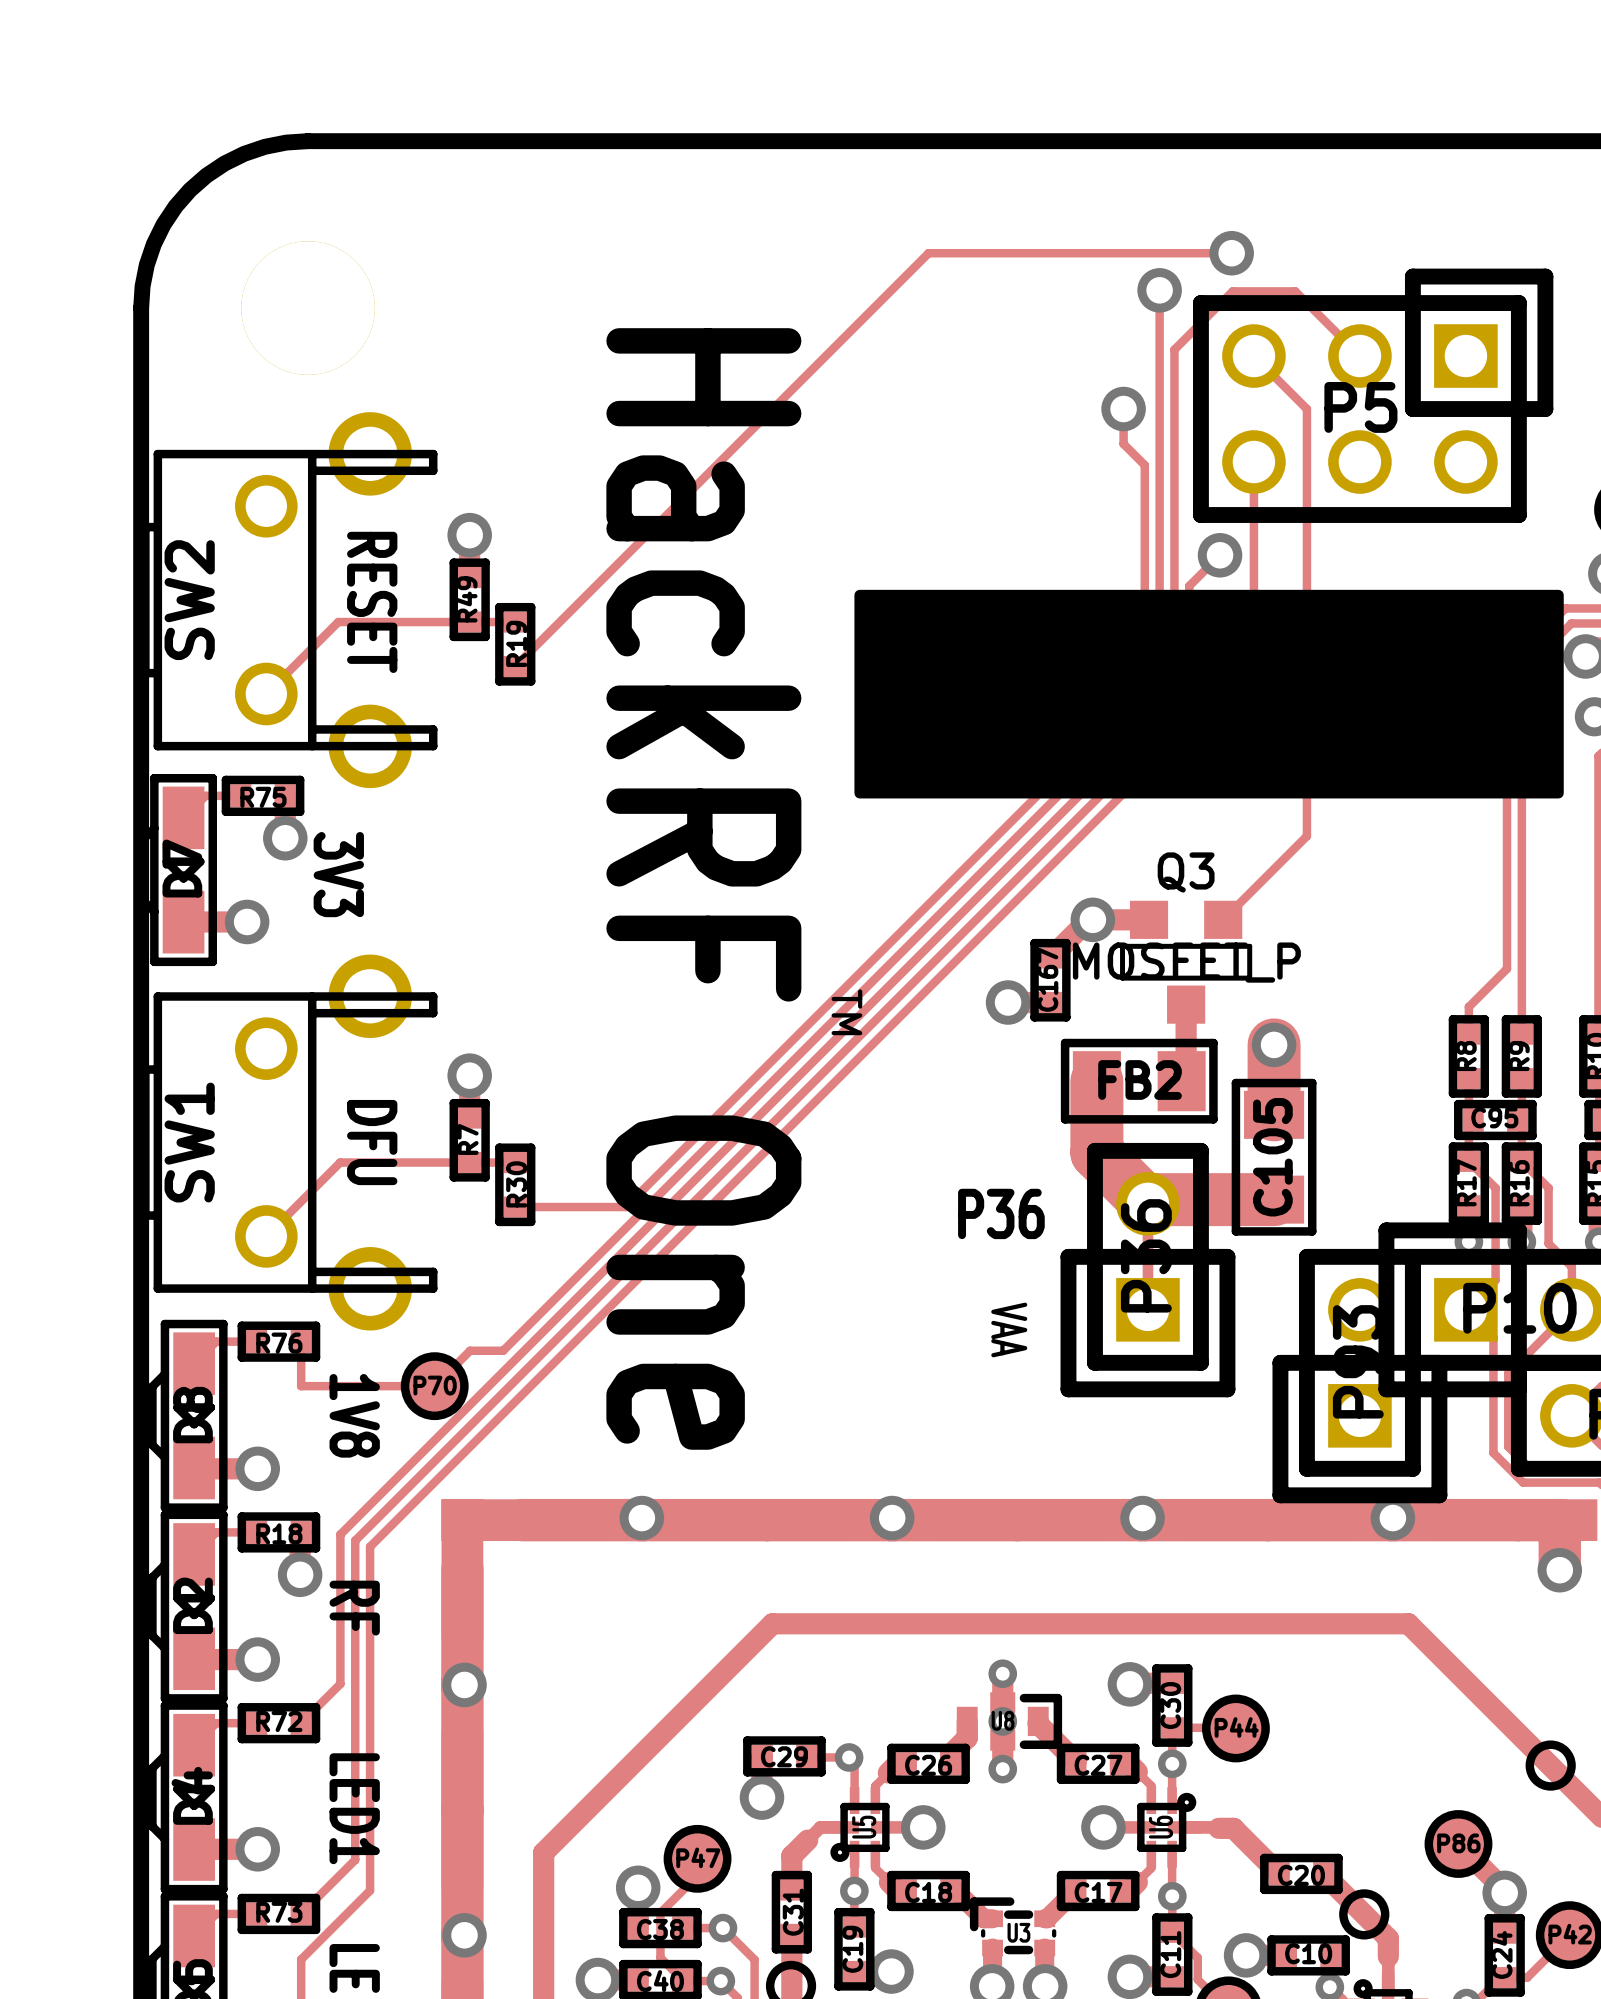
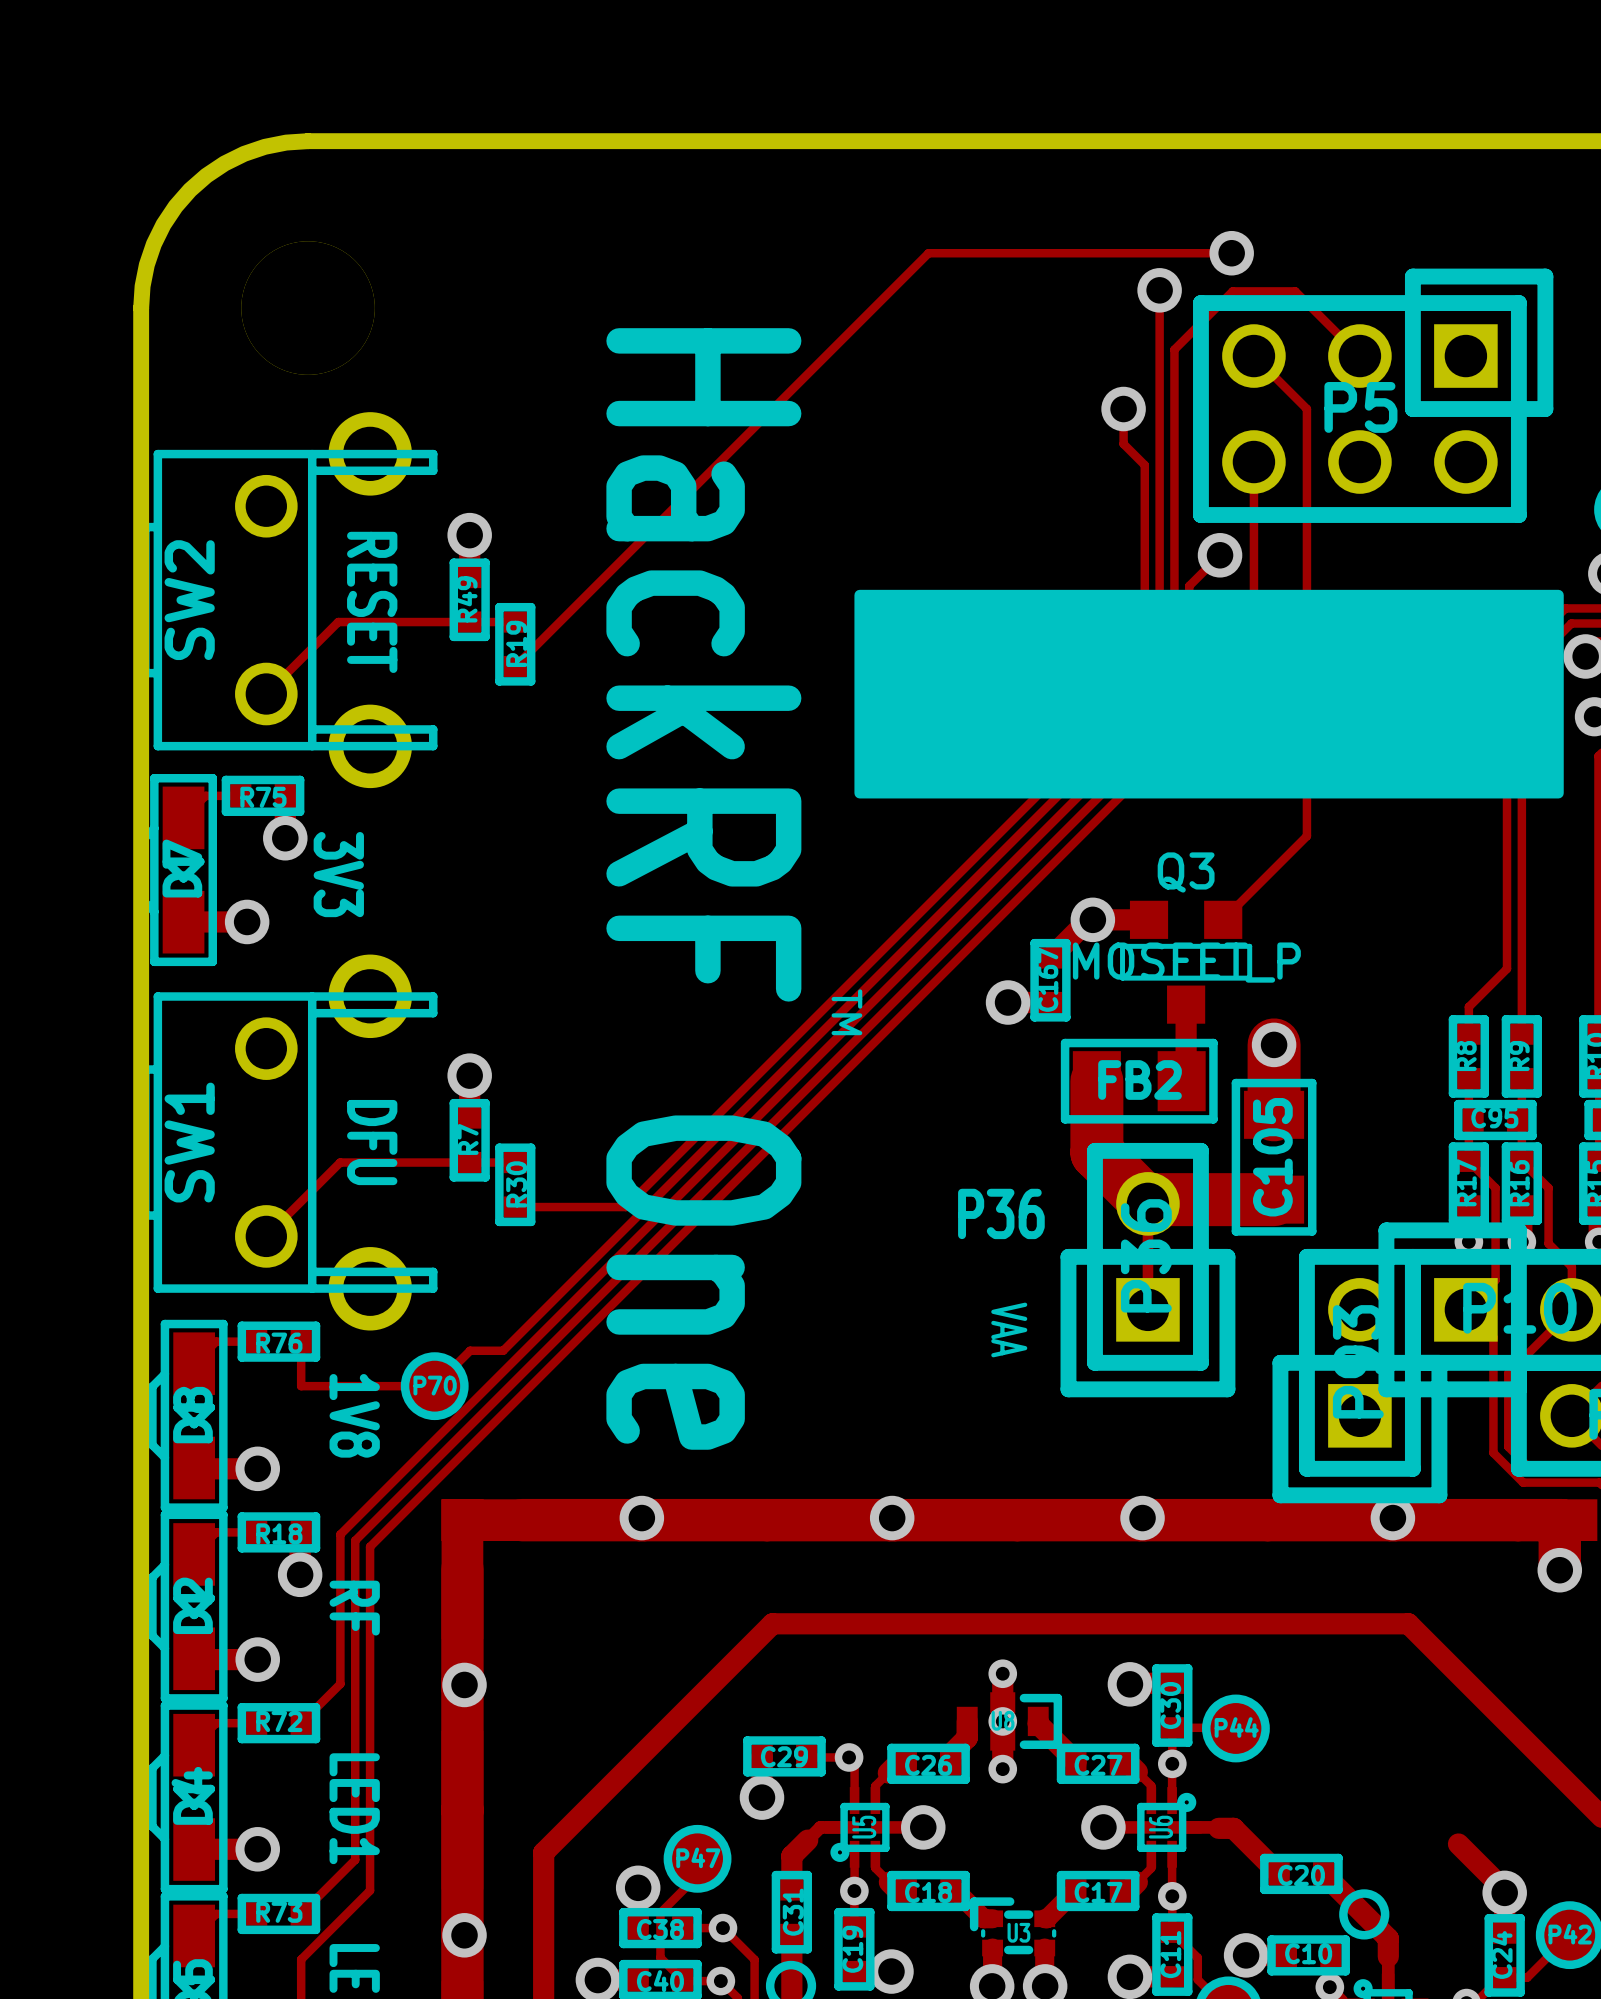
drawing: [1525, 1740, 1576, 1791] -> none
P86: (1458, 1843) -> none

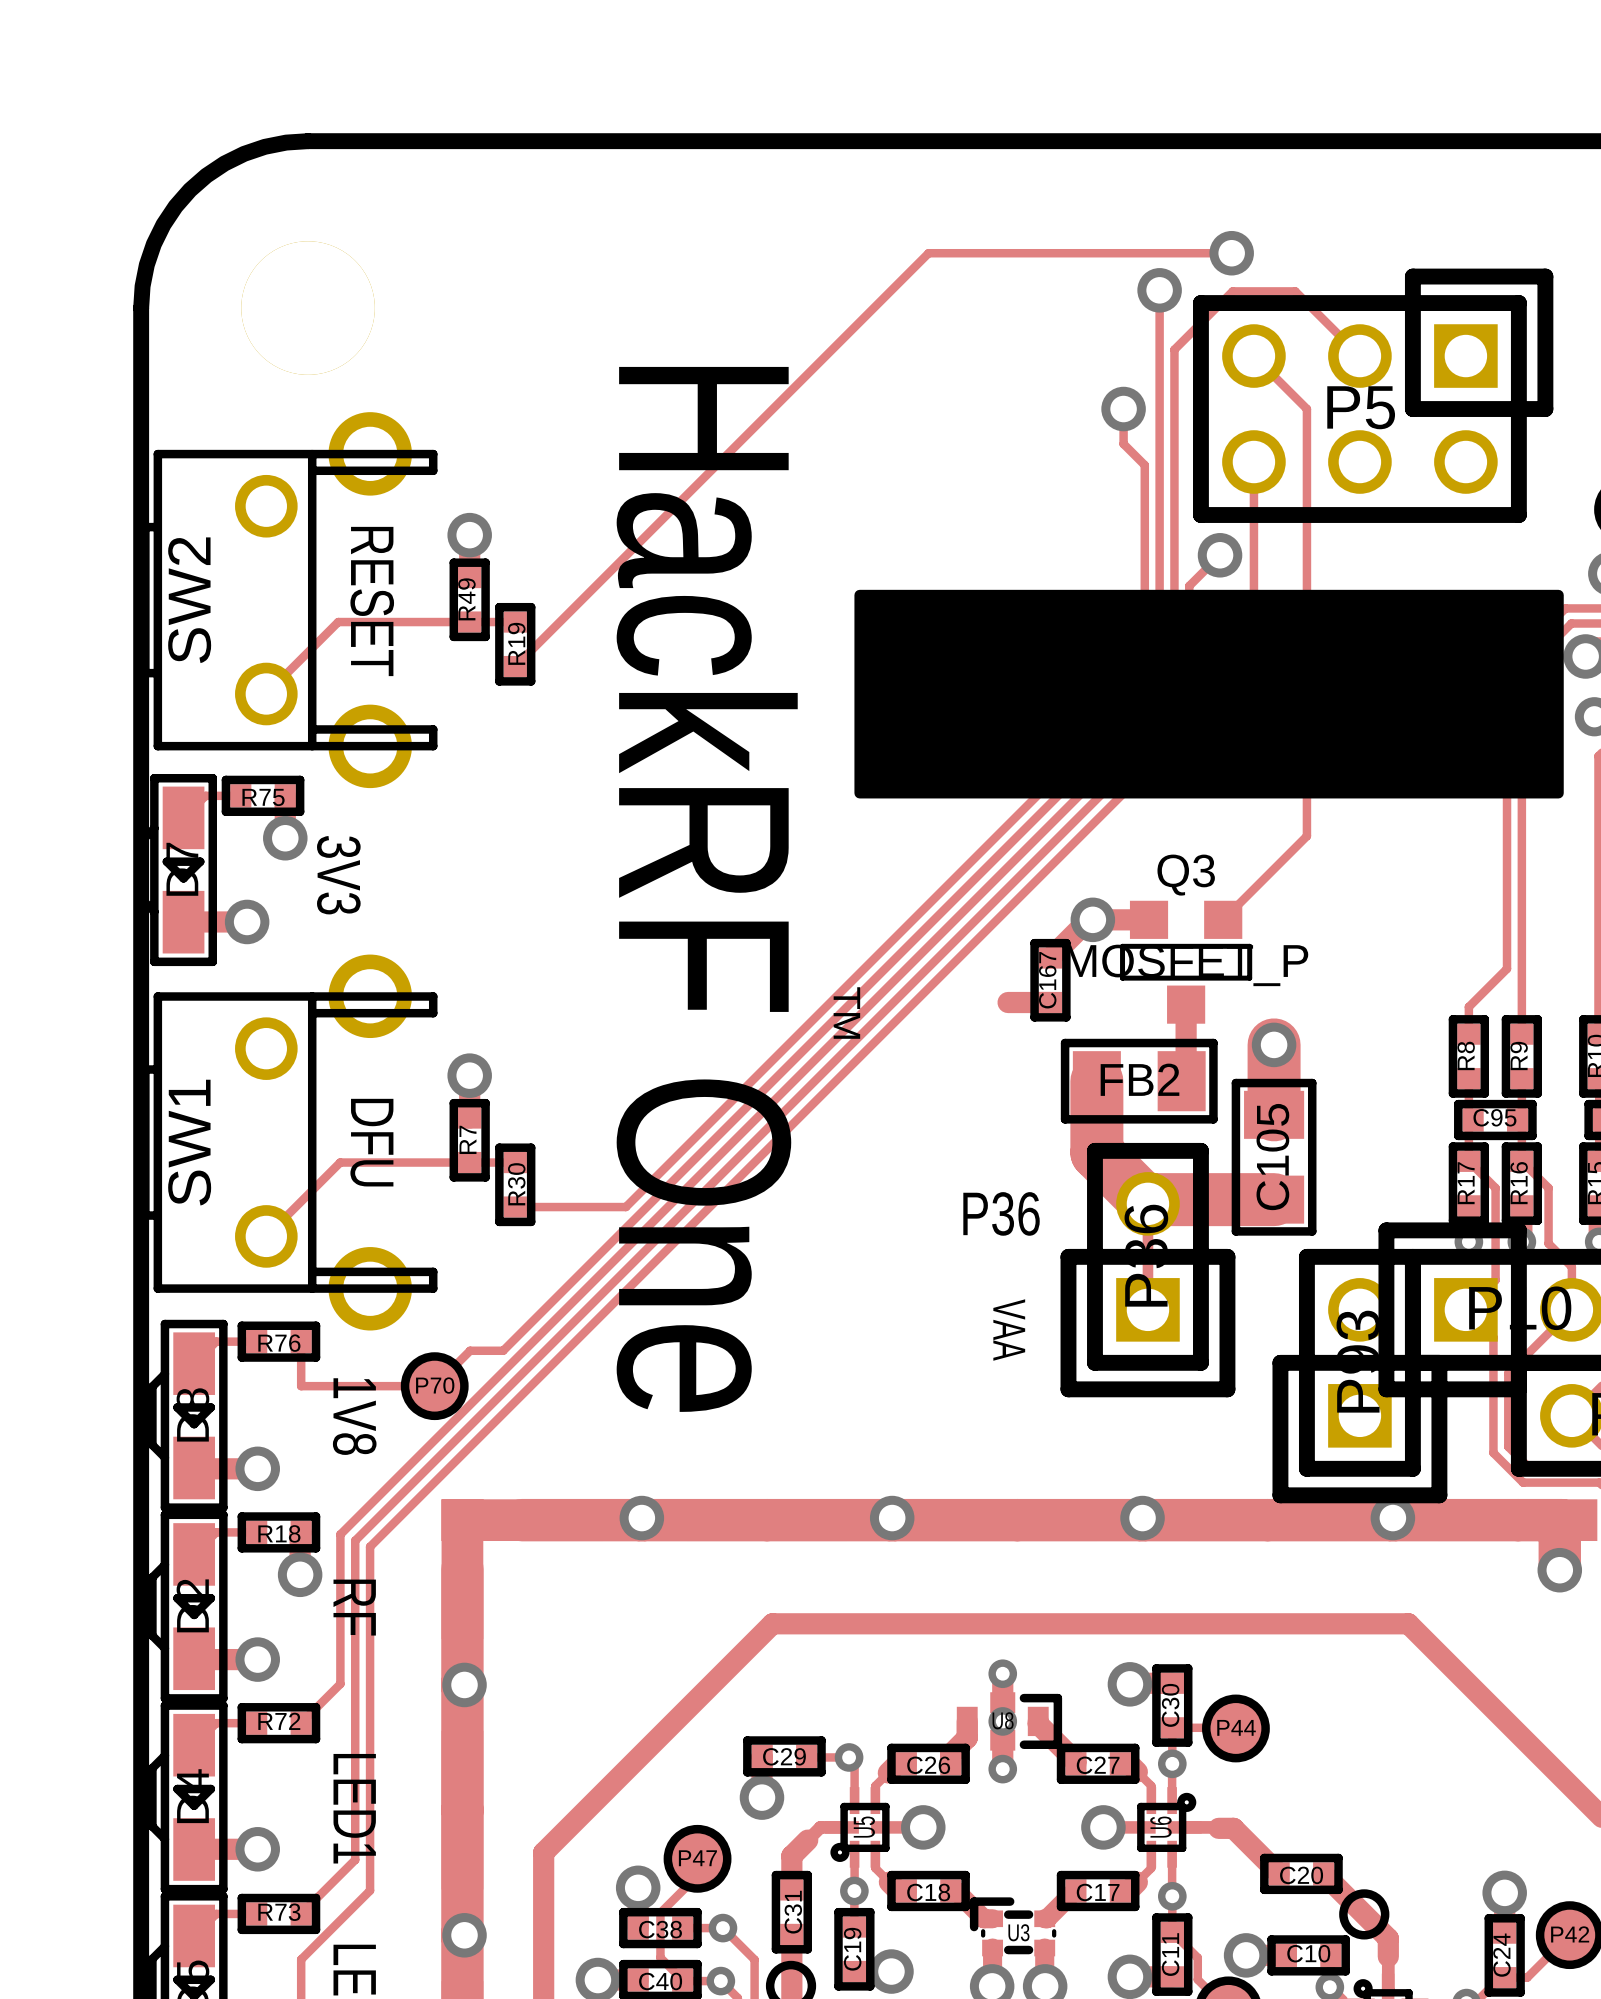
via: (1008, 1002) -> none
track: (1458, 1843) (1504, 1890) (1504, 1892) -> none

